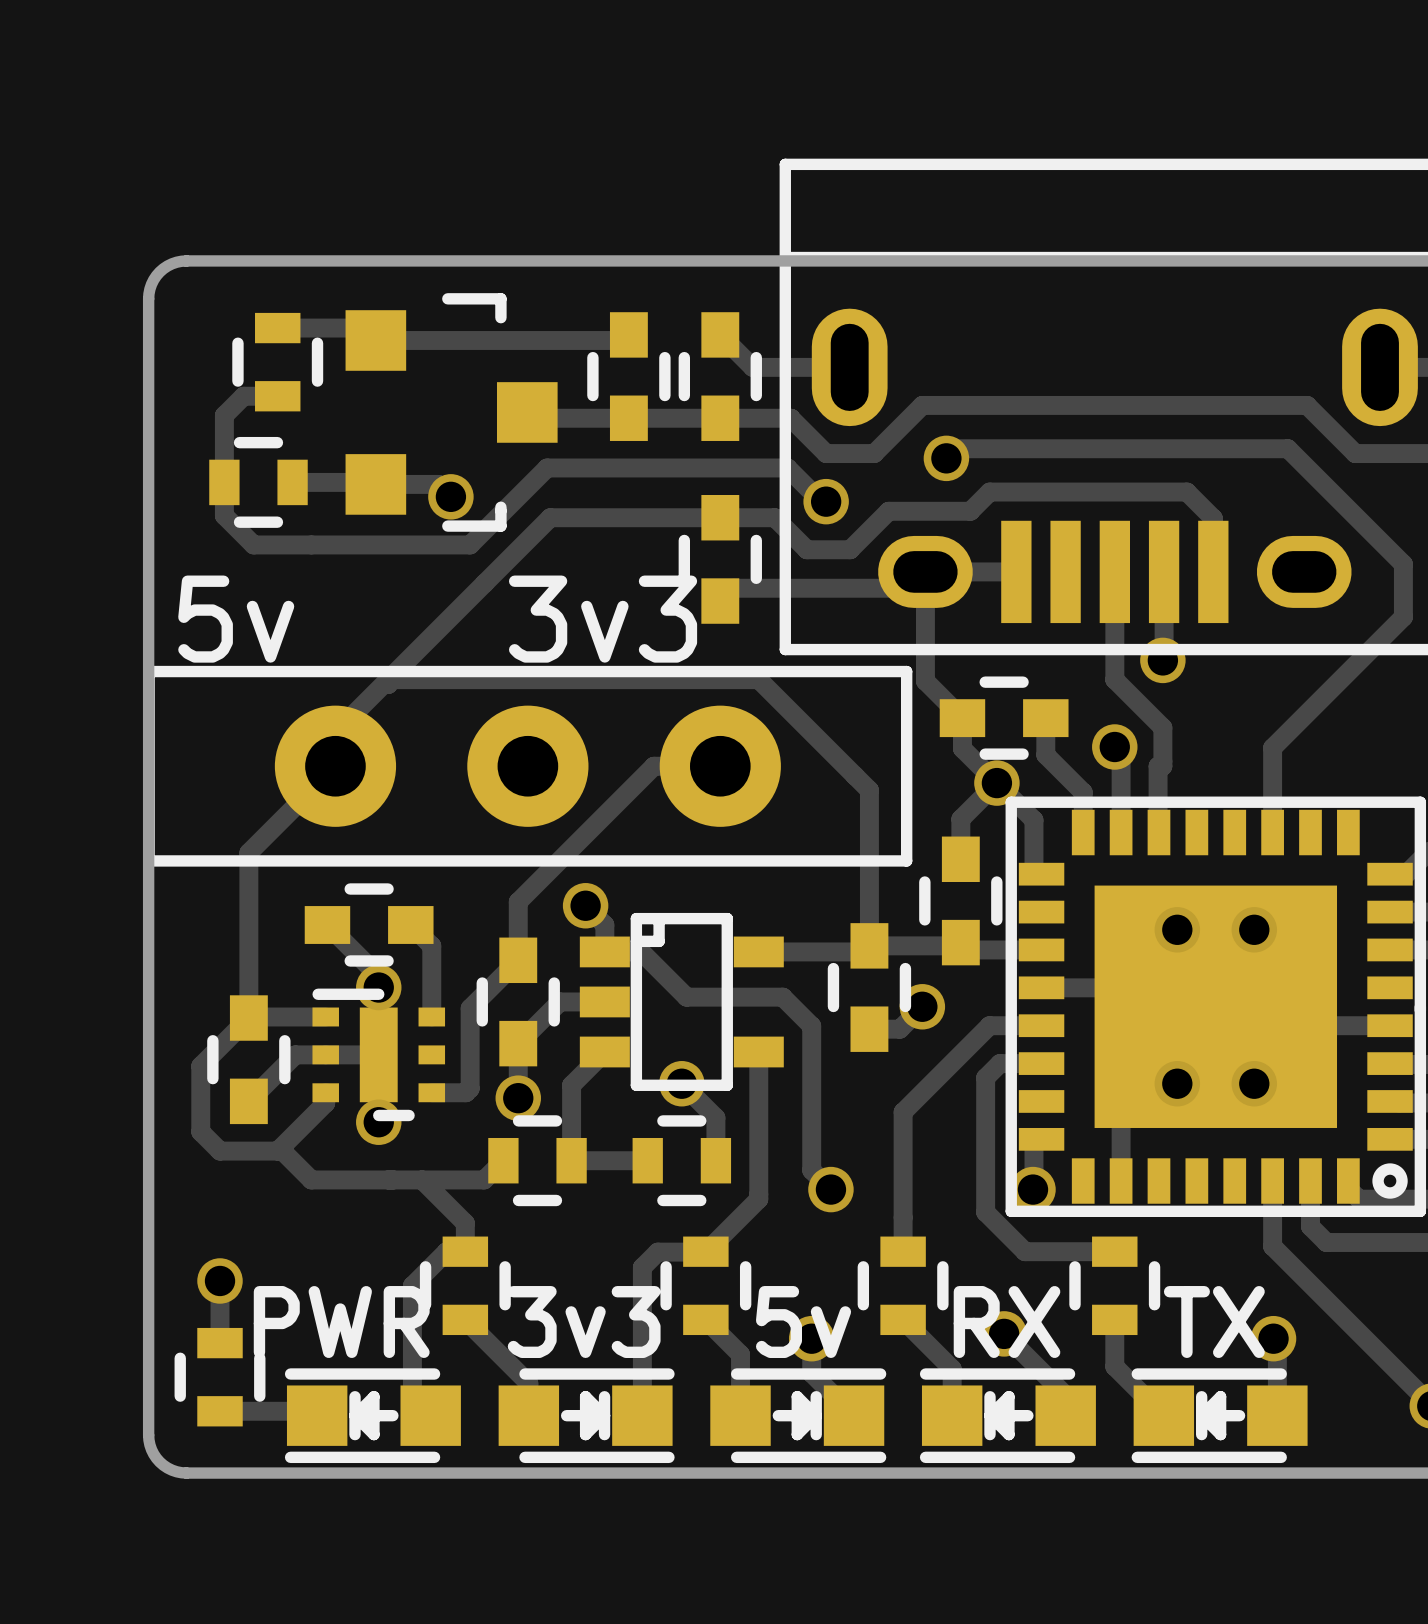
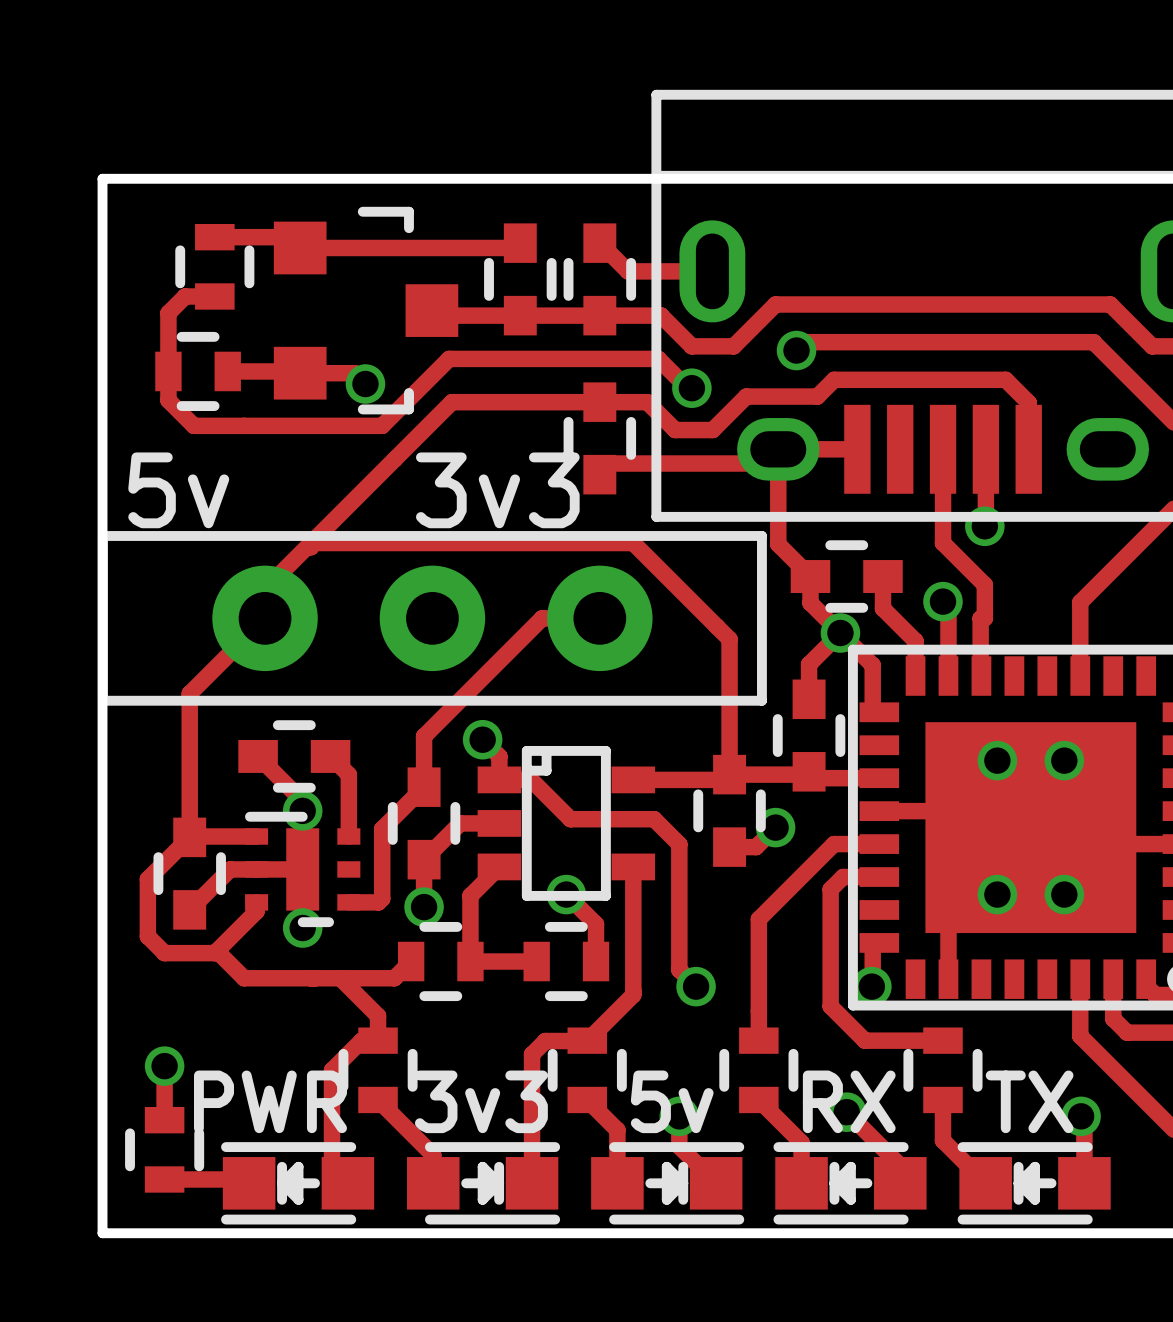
board edge: (186, 260) (172, 263) (159, 272) (151, 284) (148, 298) -> (135, 178) (102, 178) (102, 211)
board edge: (148, 1435) (151, 1449) (159, 1461) (172, 1470) (186, 1473) -> (102, 1200) (102, 1233) (135, 1233)

